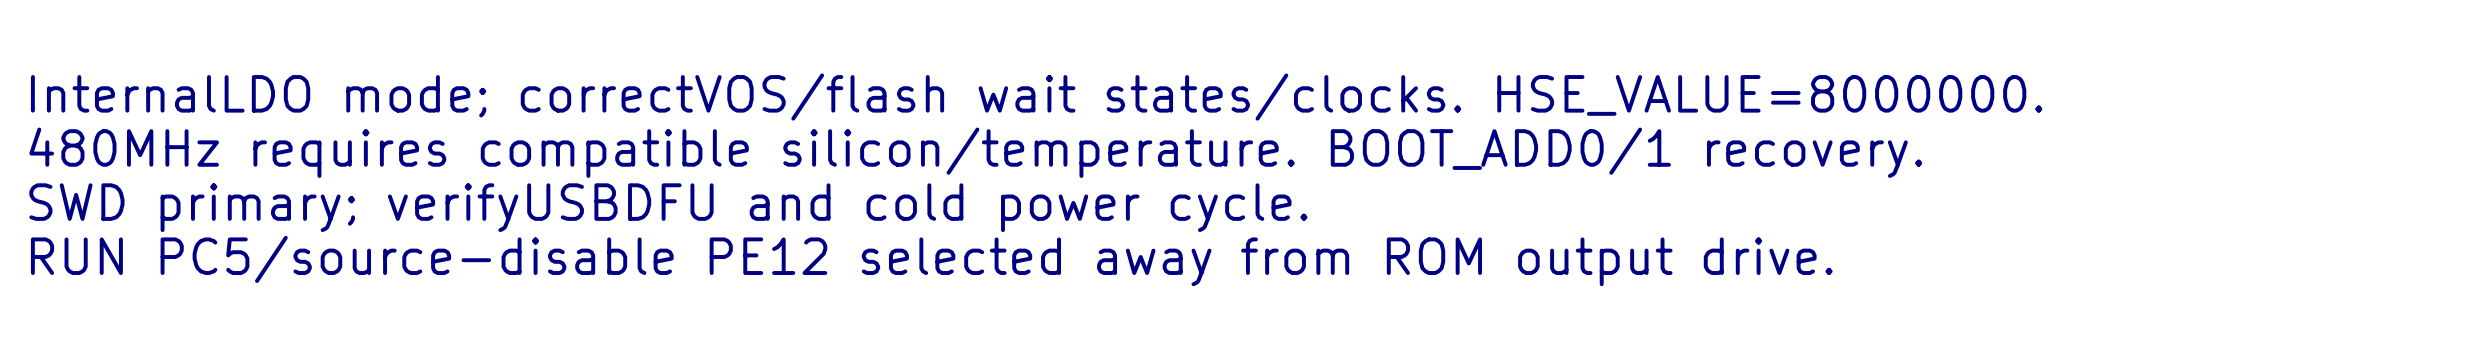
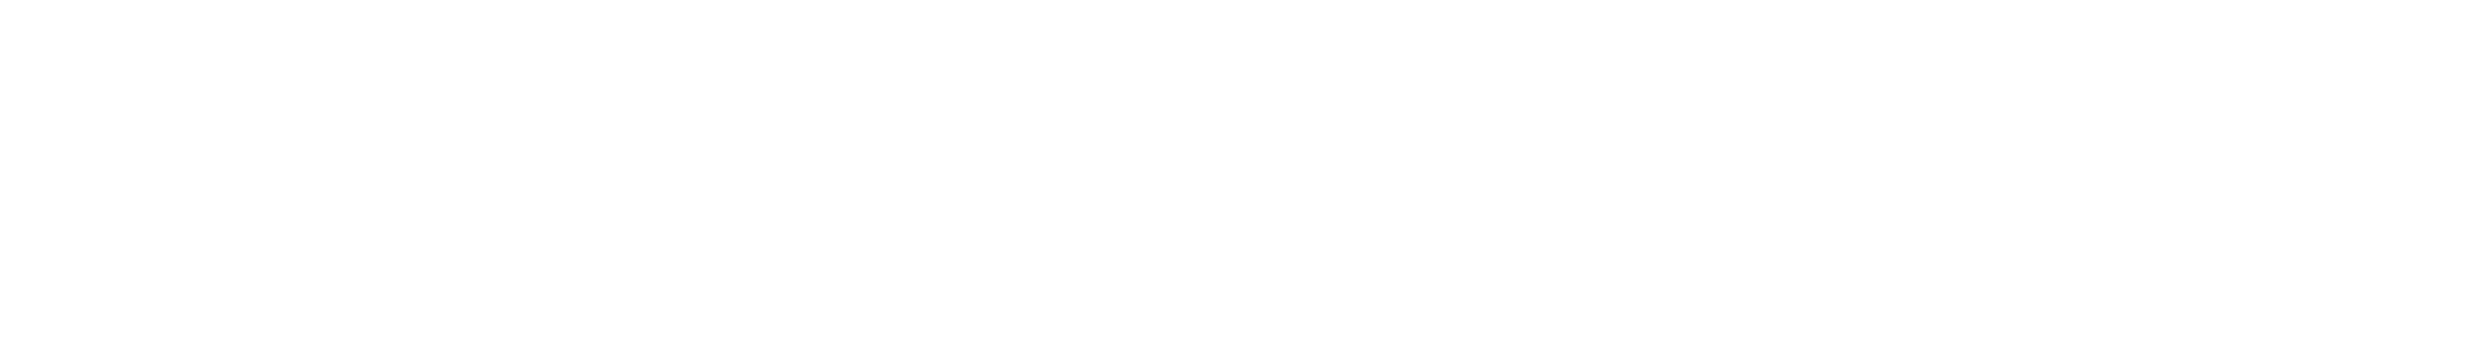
text: InternalLDO mode; correctVOS/flash wait states/clocks. HSE_VALUE=8000000. (1036, 97) -> none
text: 480MHz requires compatible silicon/temperature. BOOT_ADD0/1 recovery. (975, 152) -> none
text: SWD primary; verifyUSBDFU and cold power cycle. (668, 207) -> none
text: RUN PC5/source-disable PE12 selected away from ROM output drive. (931, 261) -> none

